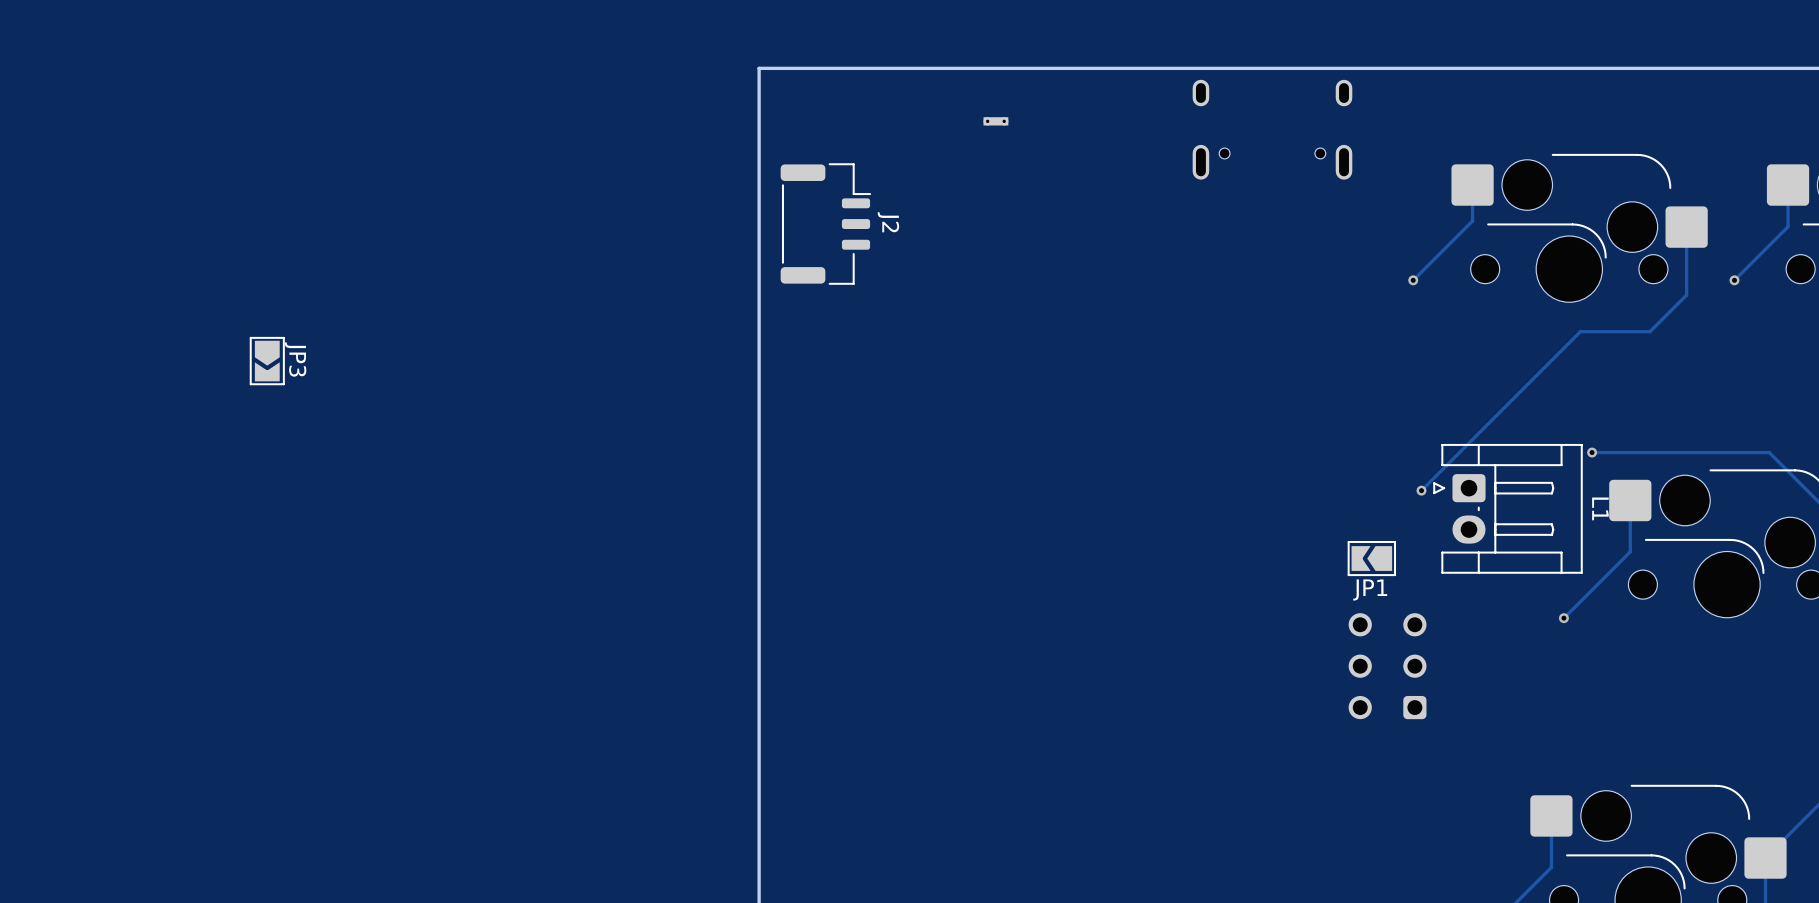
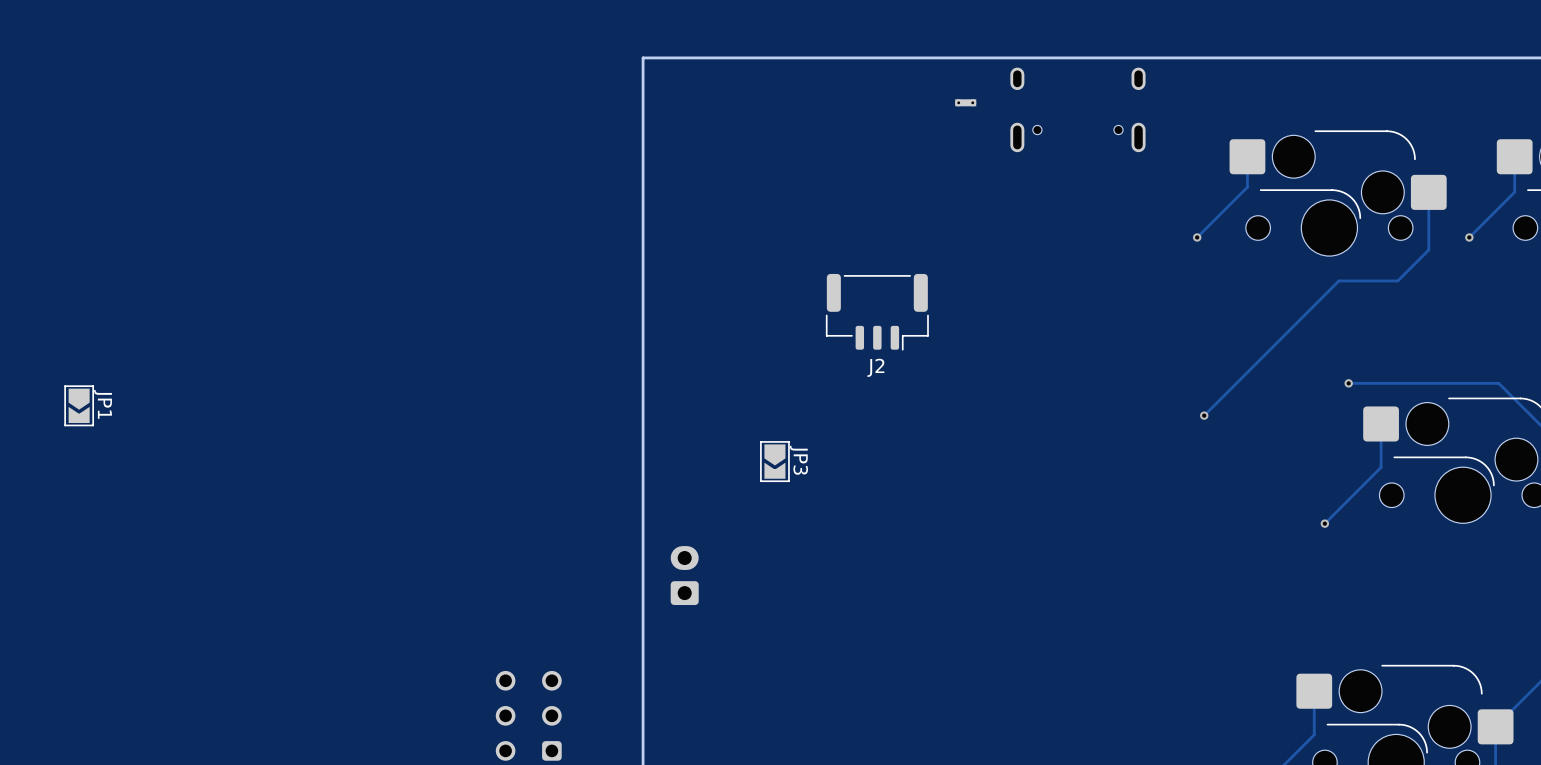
part position: (995, 121) -> (965, 102)
J2 rotation: 0° (825, 224) -> 90° clockwise (877, 312)
J2 position: (825, 224) -> (877, 312)
JP3 position: (267, 361) -> (774, 461)
L1: (1507, 508) -> none
JP1 rotation: 0° (1371, 558) -> 90° counterclockwise (79, 405)
JP1 position: (1371, 558) -> (79, 405)
part: (1387, 666) -> none
part: none -> (684, 575)
part: none -> (528, 715)

